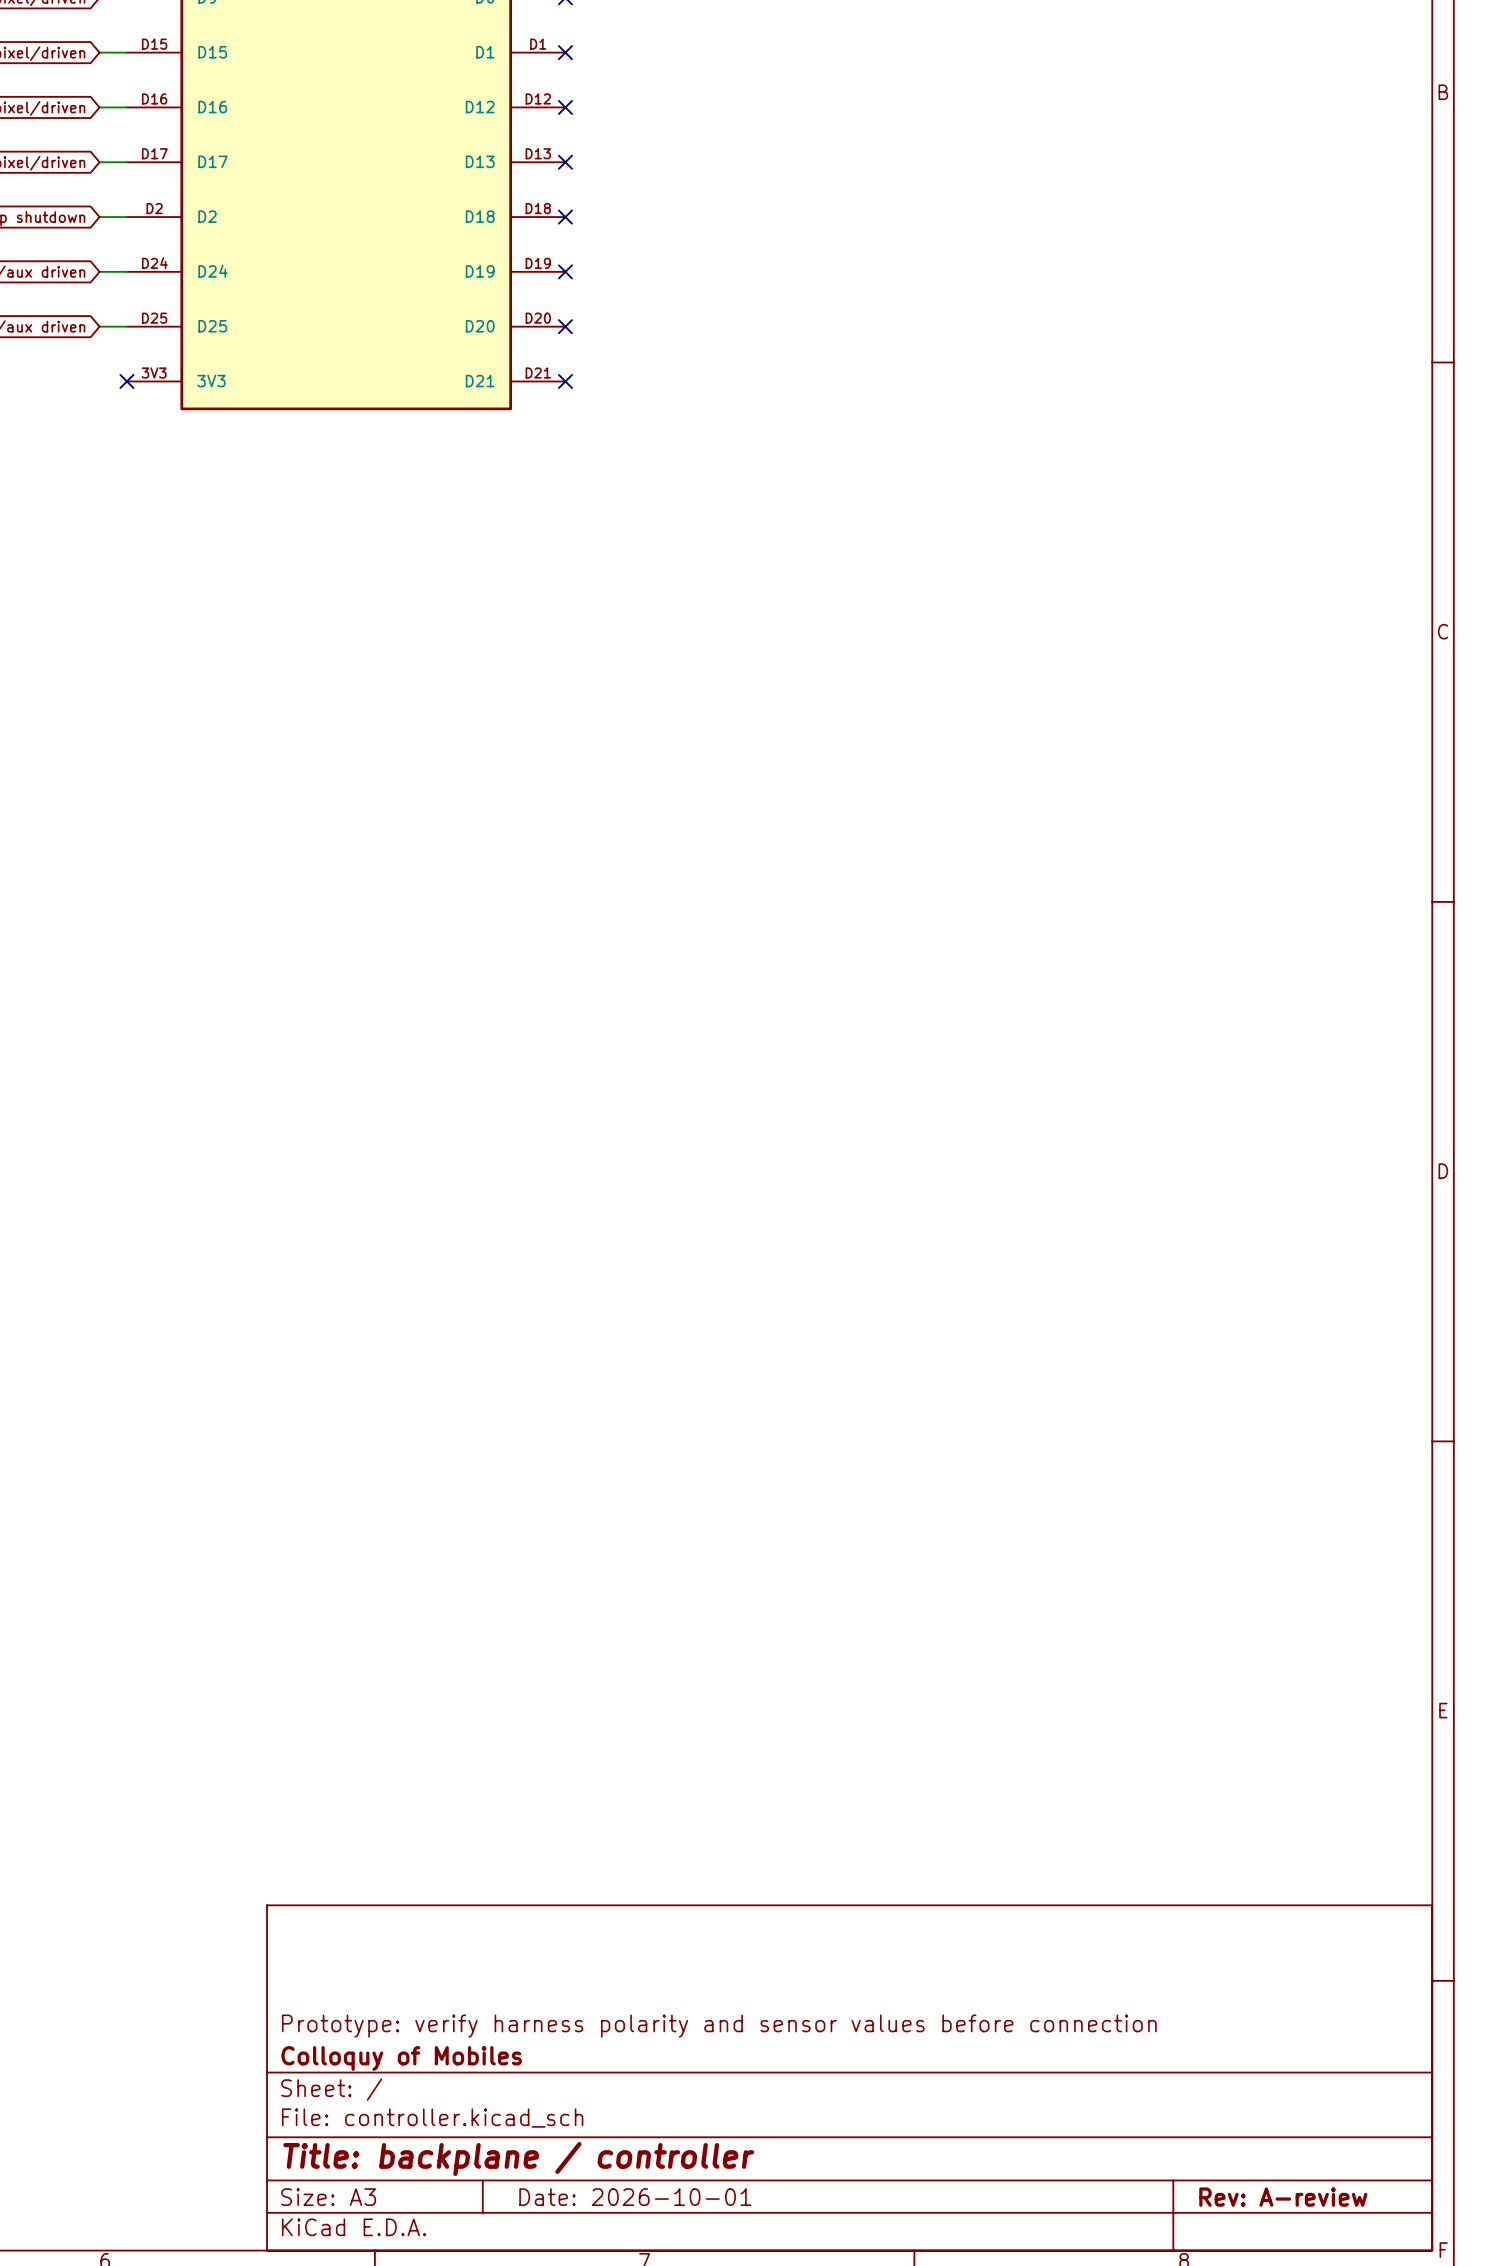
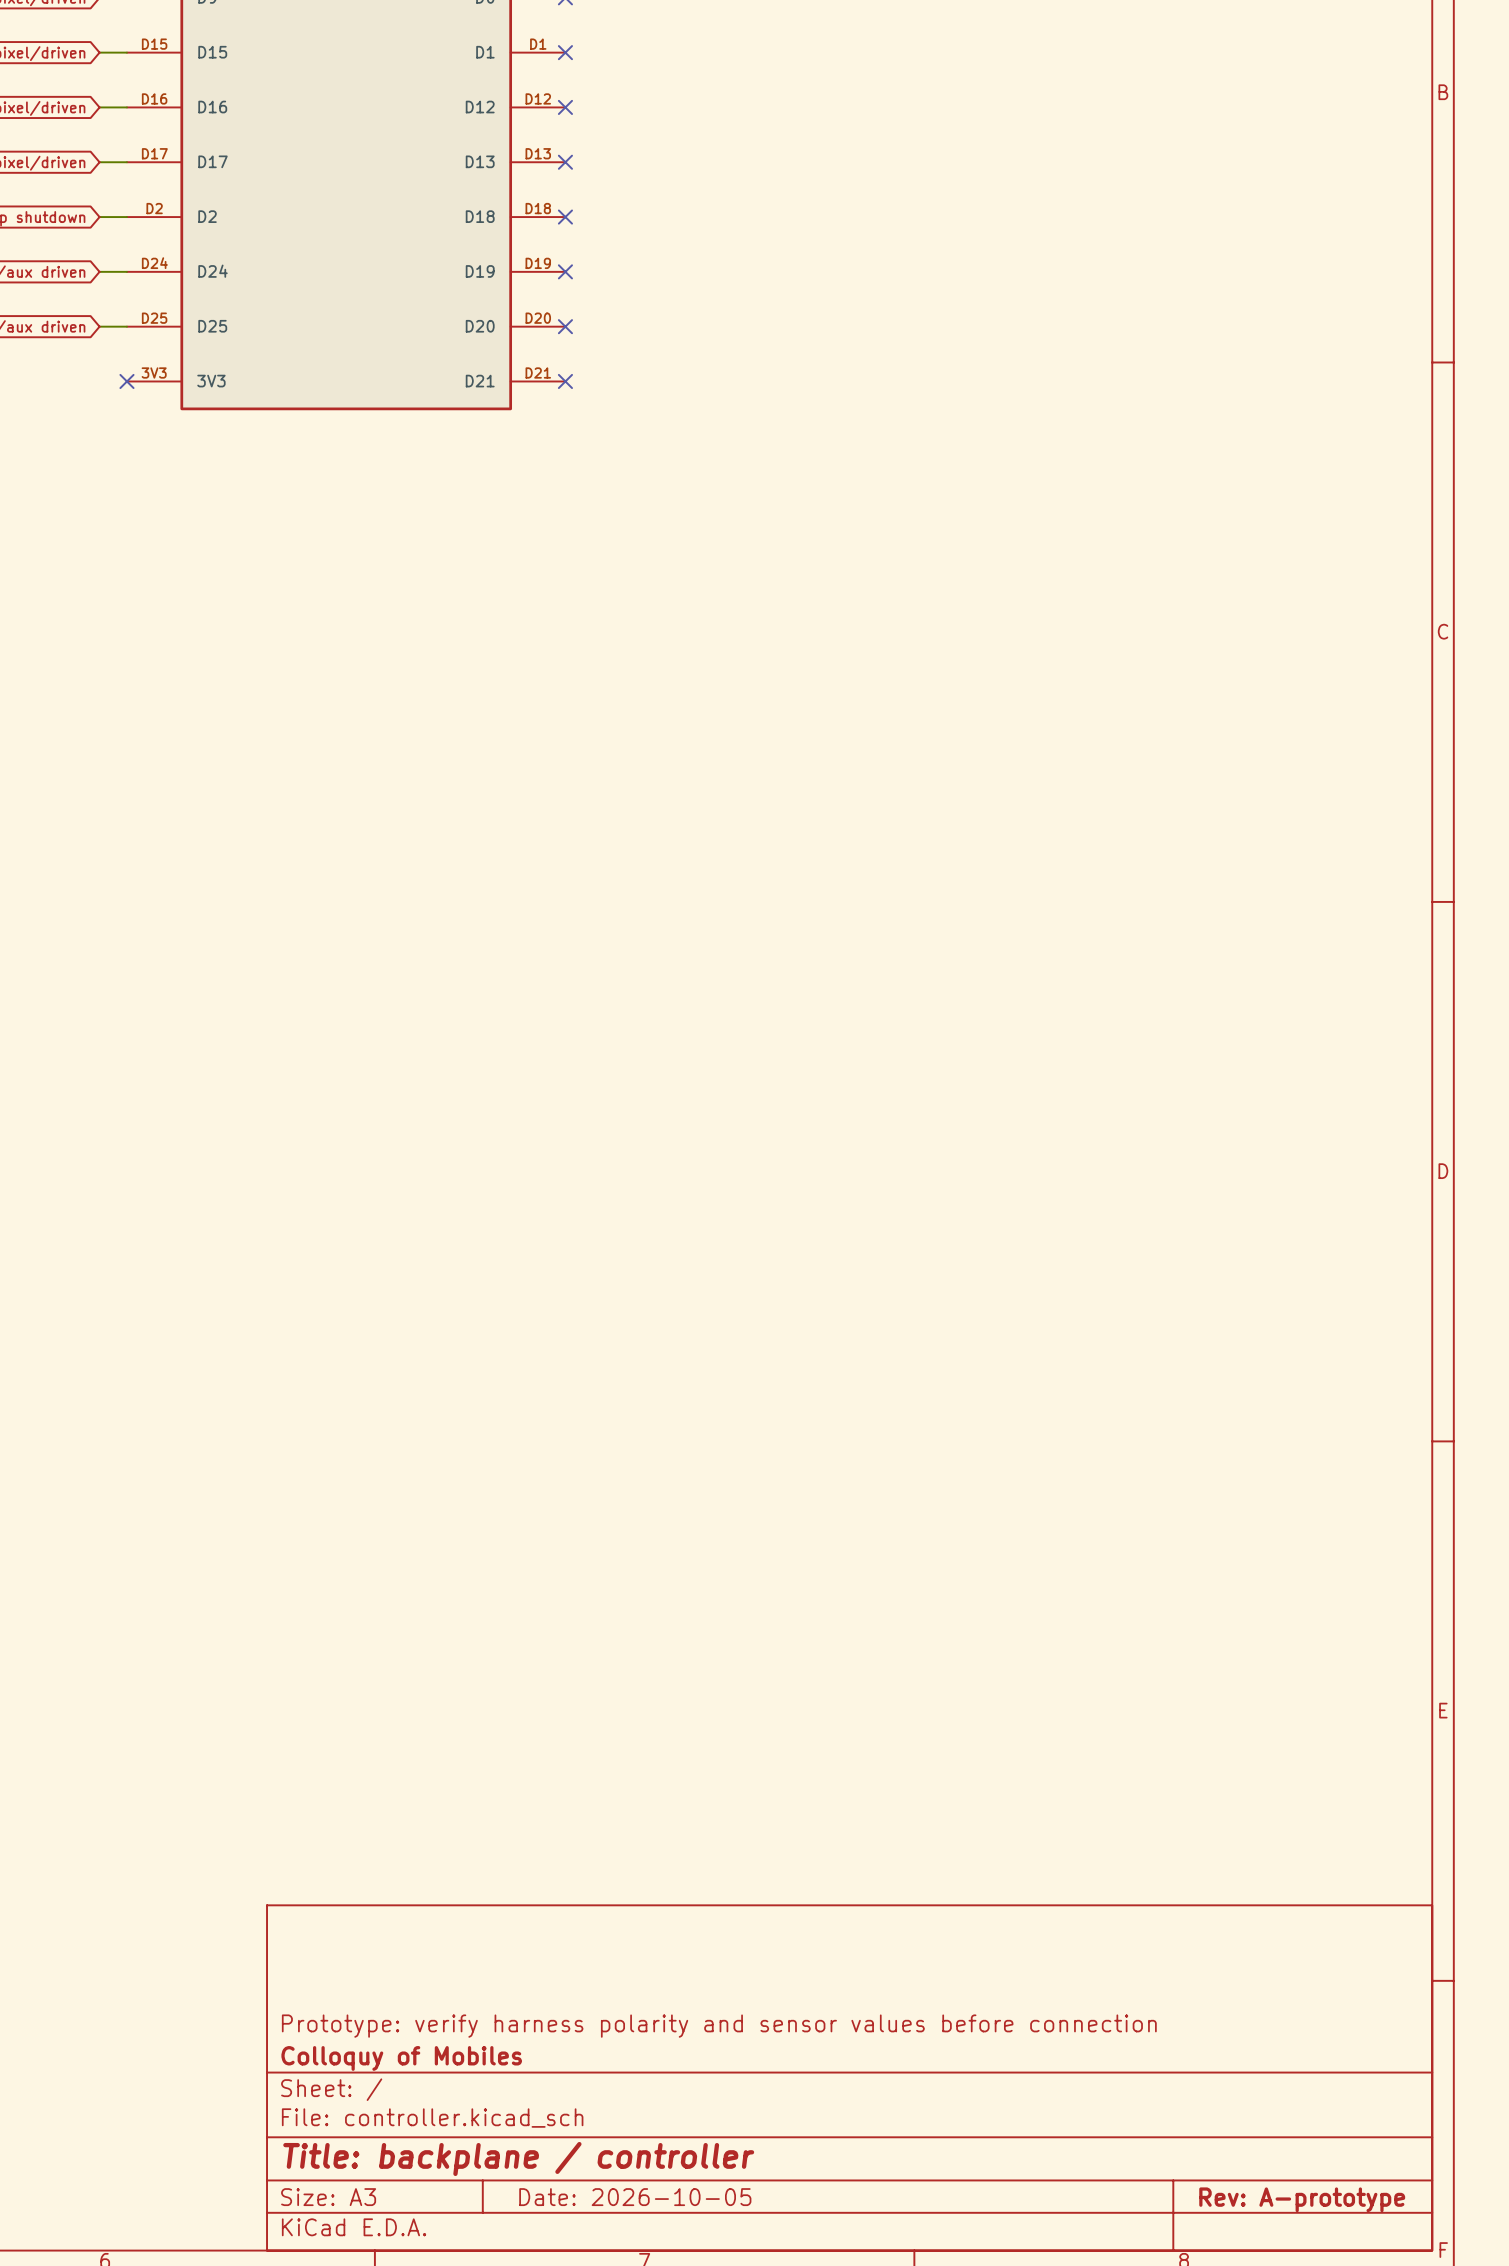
title block: Date: 2026-10-01 (635, 2197) -> Date: 2026-10-05 (635, 2197)
title block: Rev: A-review (1283, 2197) -> Rev: A-prototype (1302, 2199)

